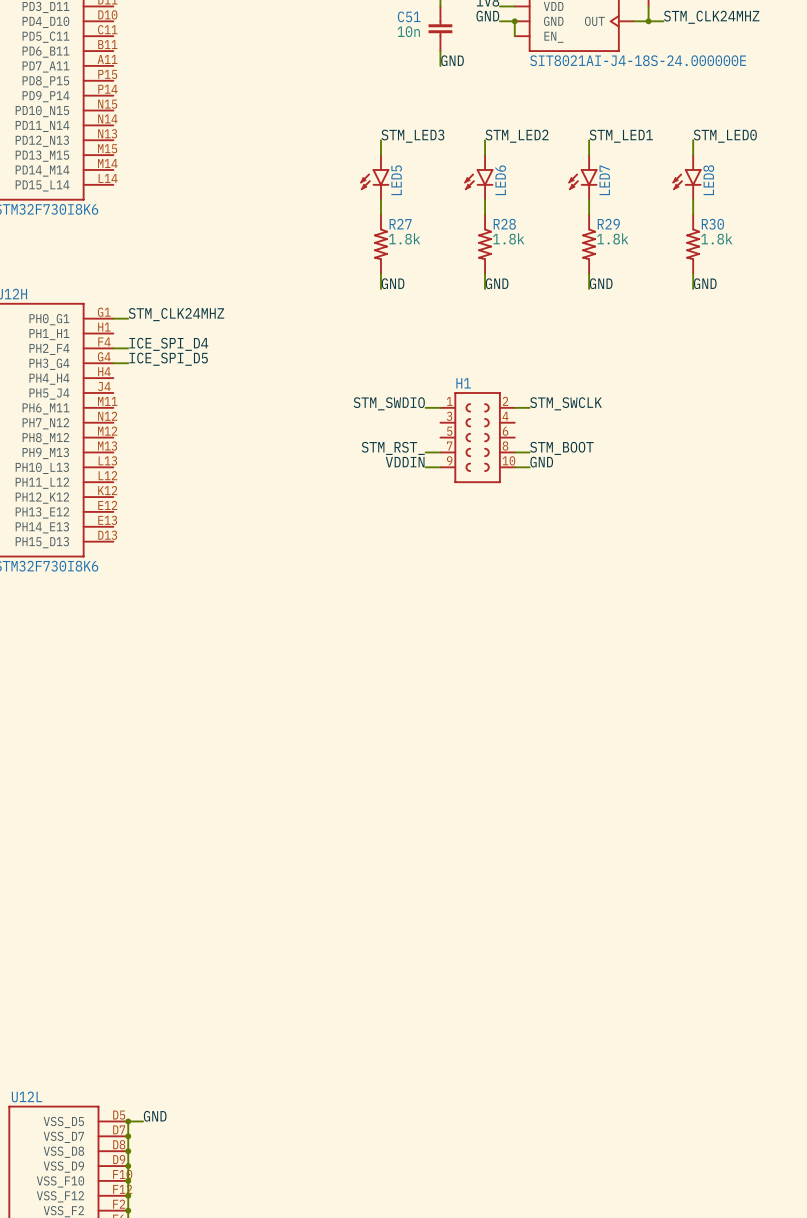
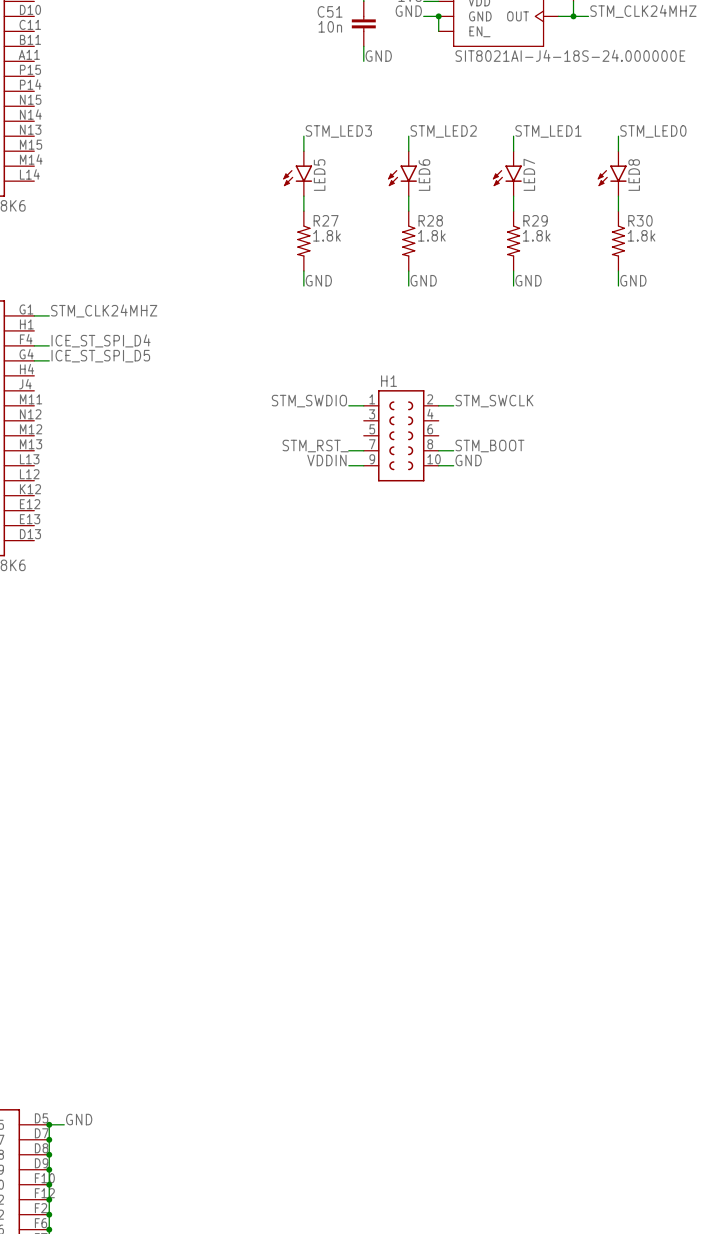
label: ICE_SPI_D4 (168, 344) -> ICE_ST_SPI_D4 (101, 340)
label: ICE_SPI_D5 (168, 359) -> ICE_ST_SPI_D5 (100, 356)

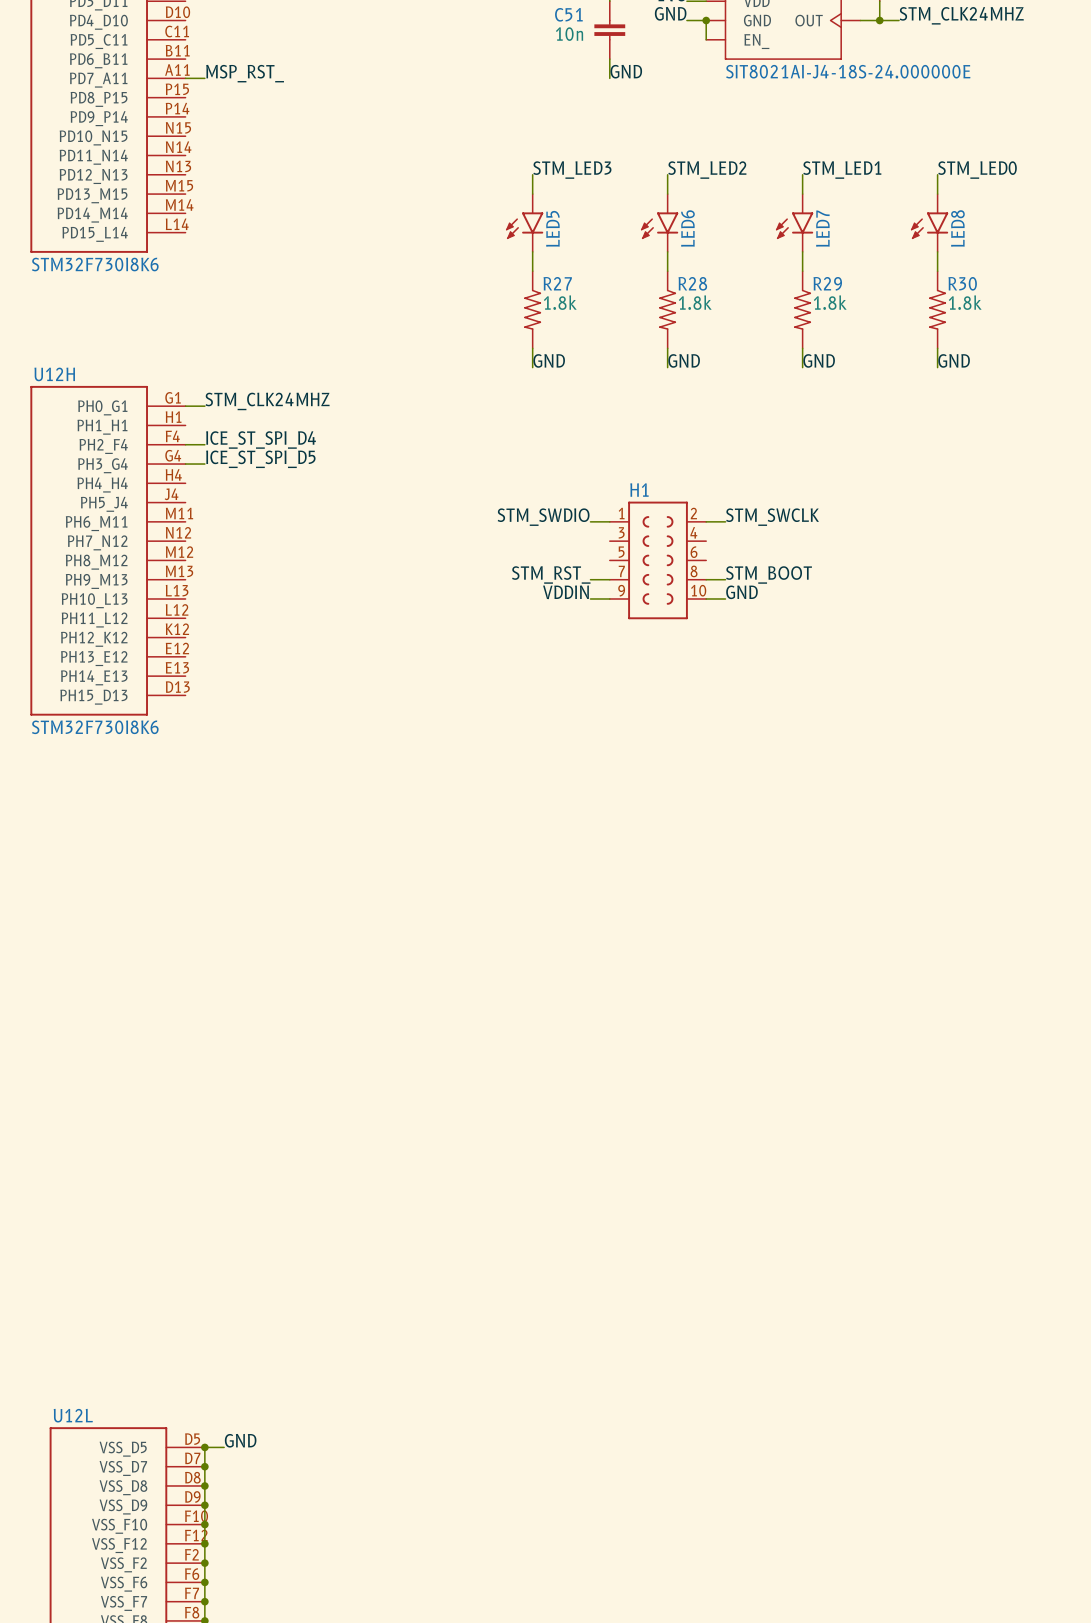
label: none -> MSP_RST_ (245, 73)
wire: none -> (185, 78) (204, 78)

